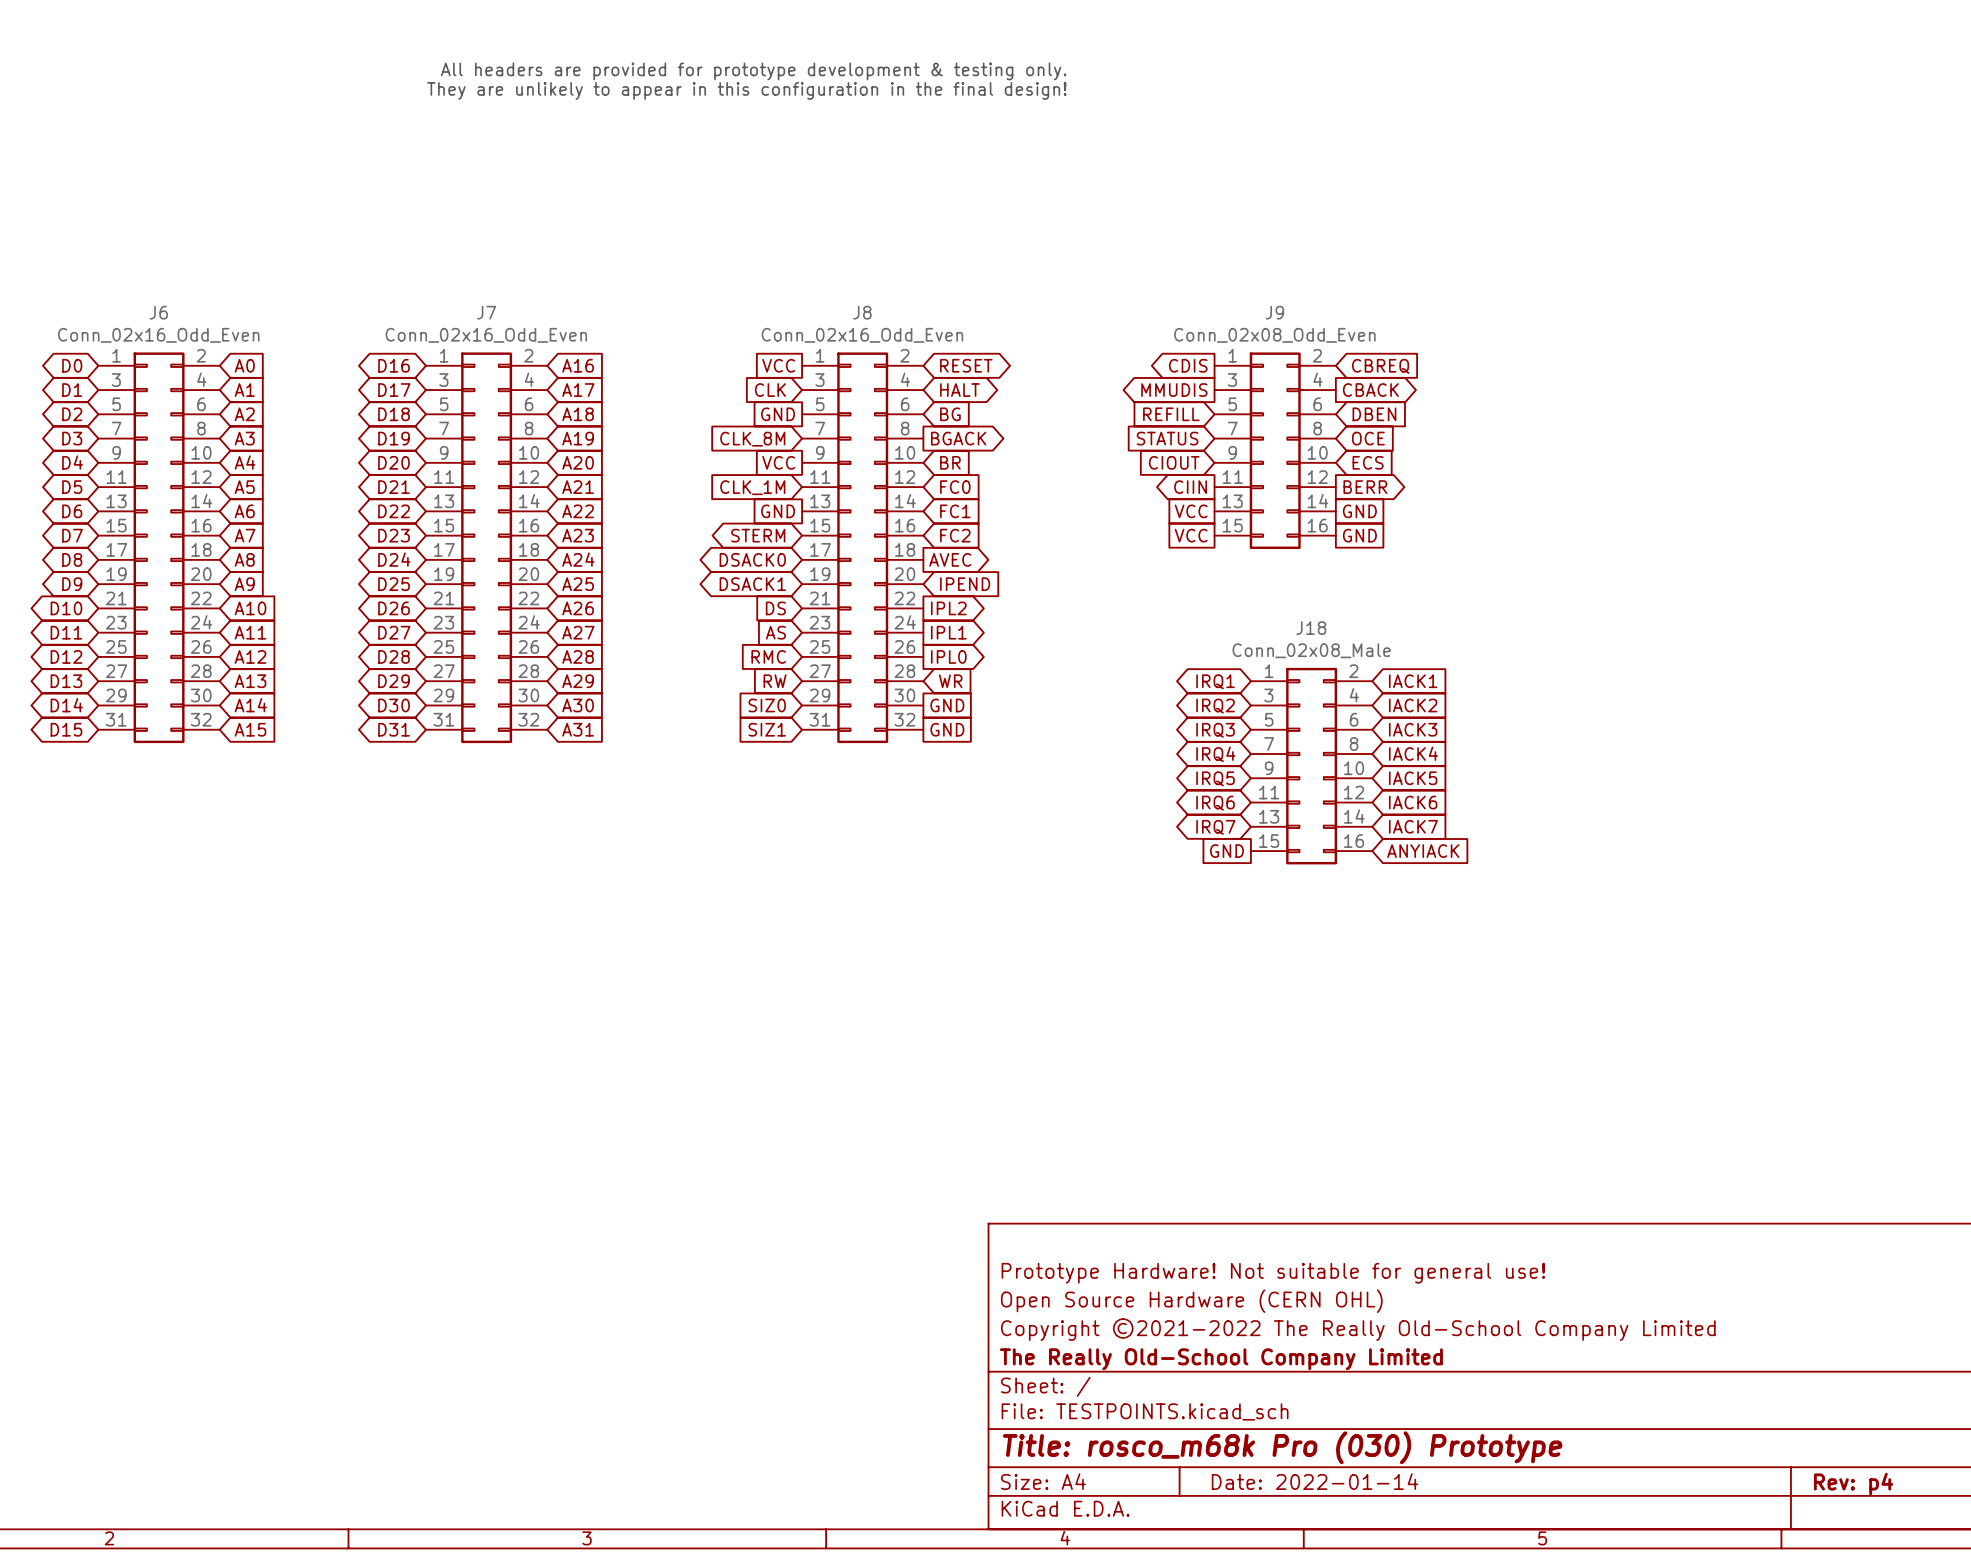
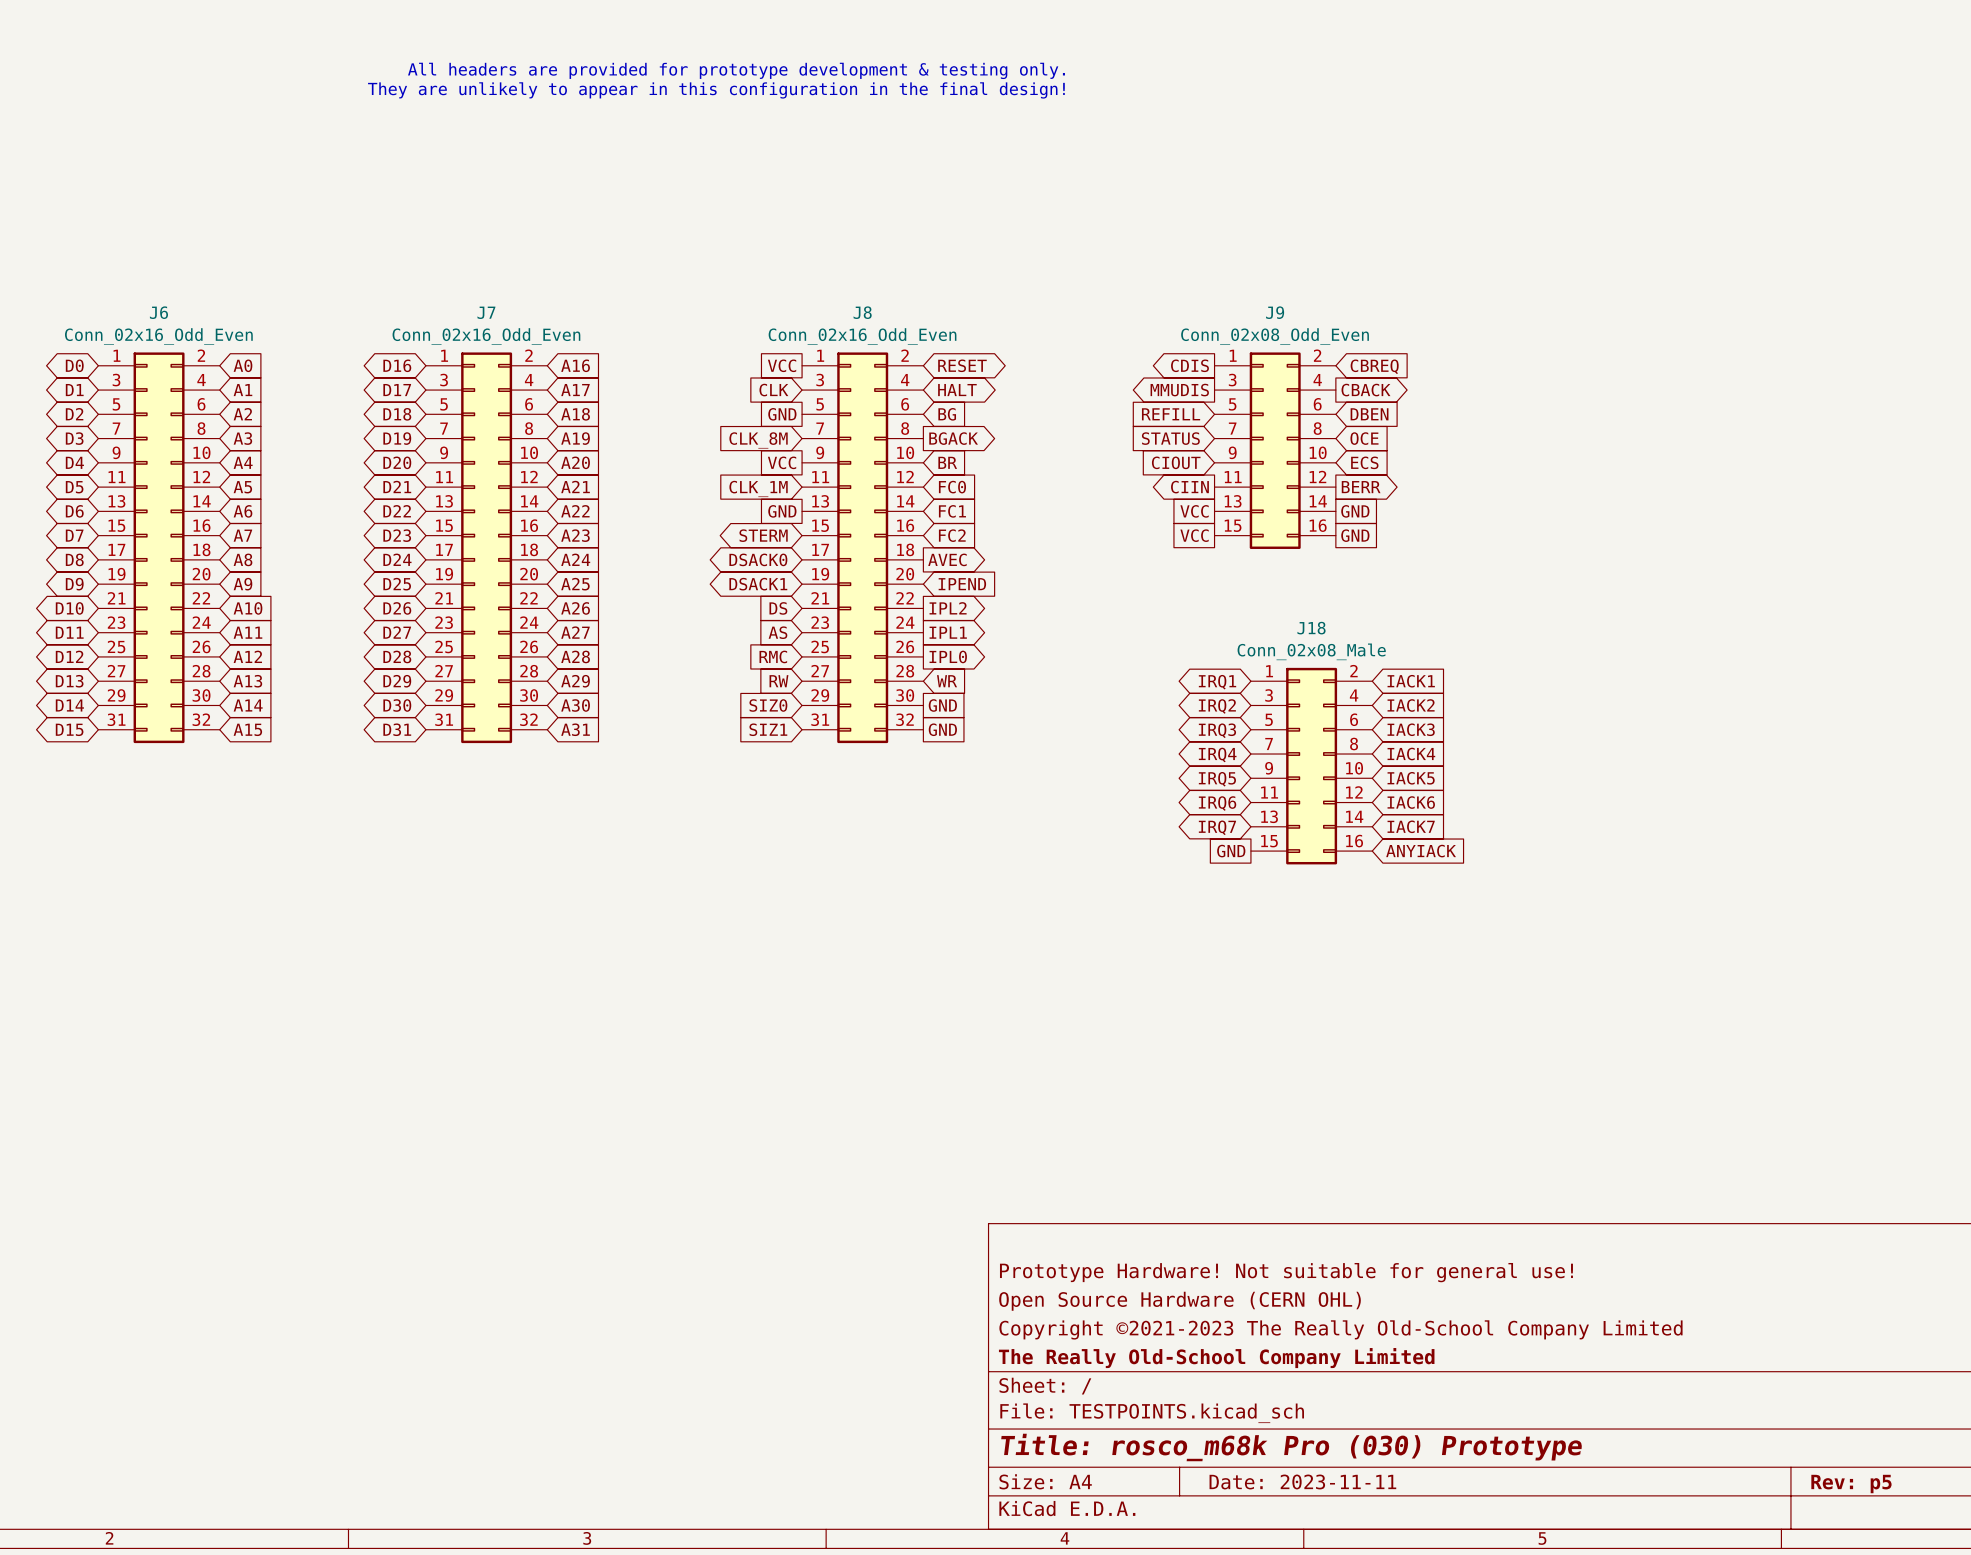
title block: Copyright ©2021-2022 The Really Old-School Company Limited (1358, 1329) -> Copyright ©2021-2023 The Really Old-School Company Limited (1340, 1329)
title block: Date: 2022-01-14 (1314, 1481) -> Date: 2023-11-11 (1302, 1481)
title block: Rev: p4 (1853, 1484) -> Rev: p5 (1851, 1484)

